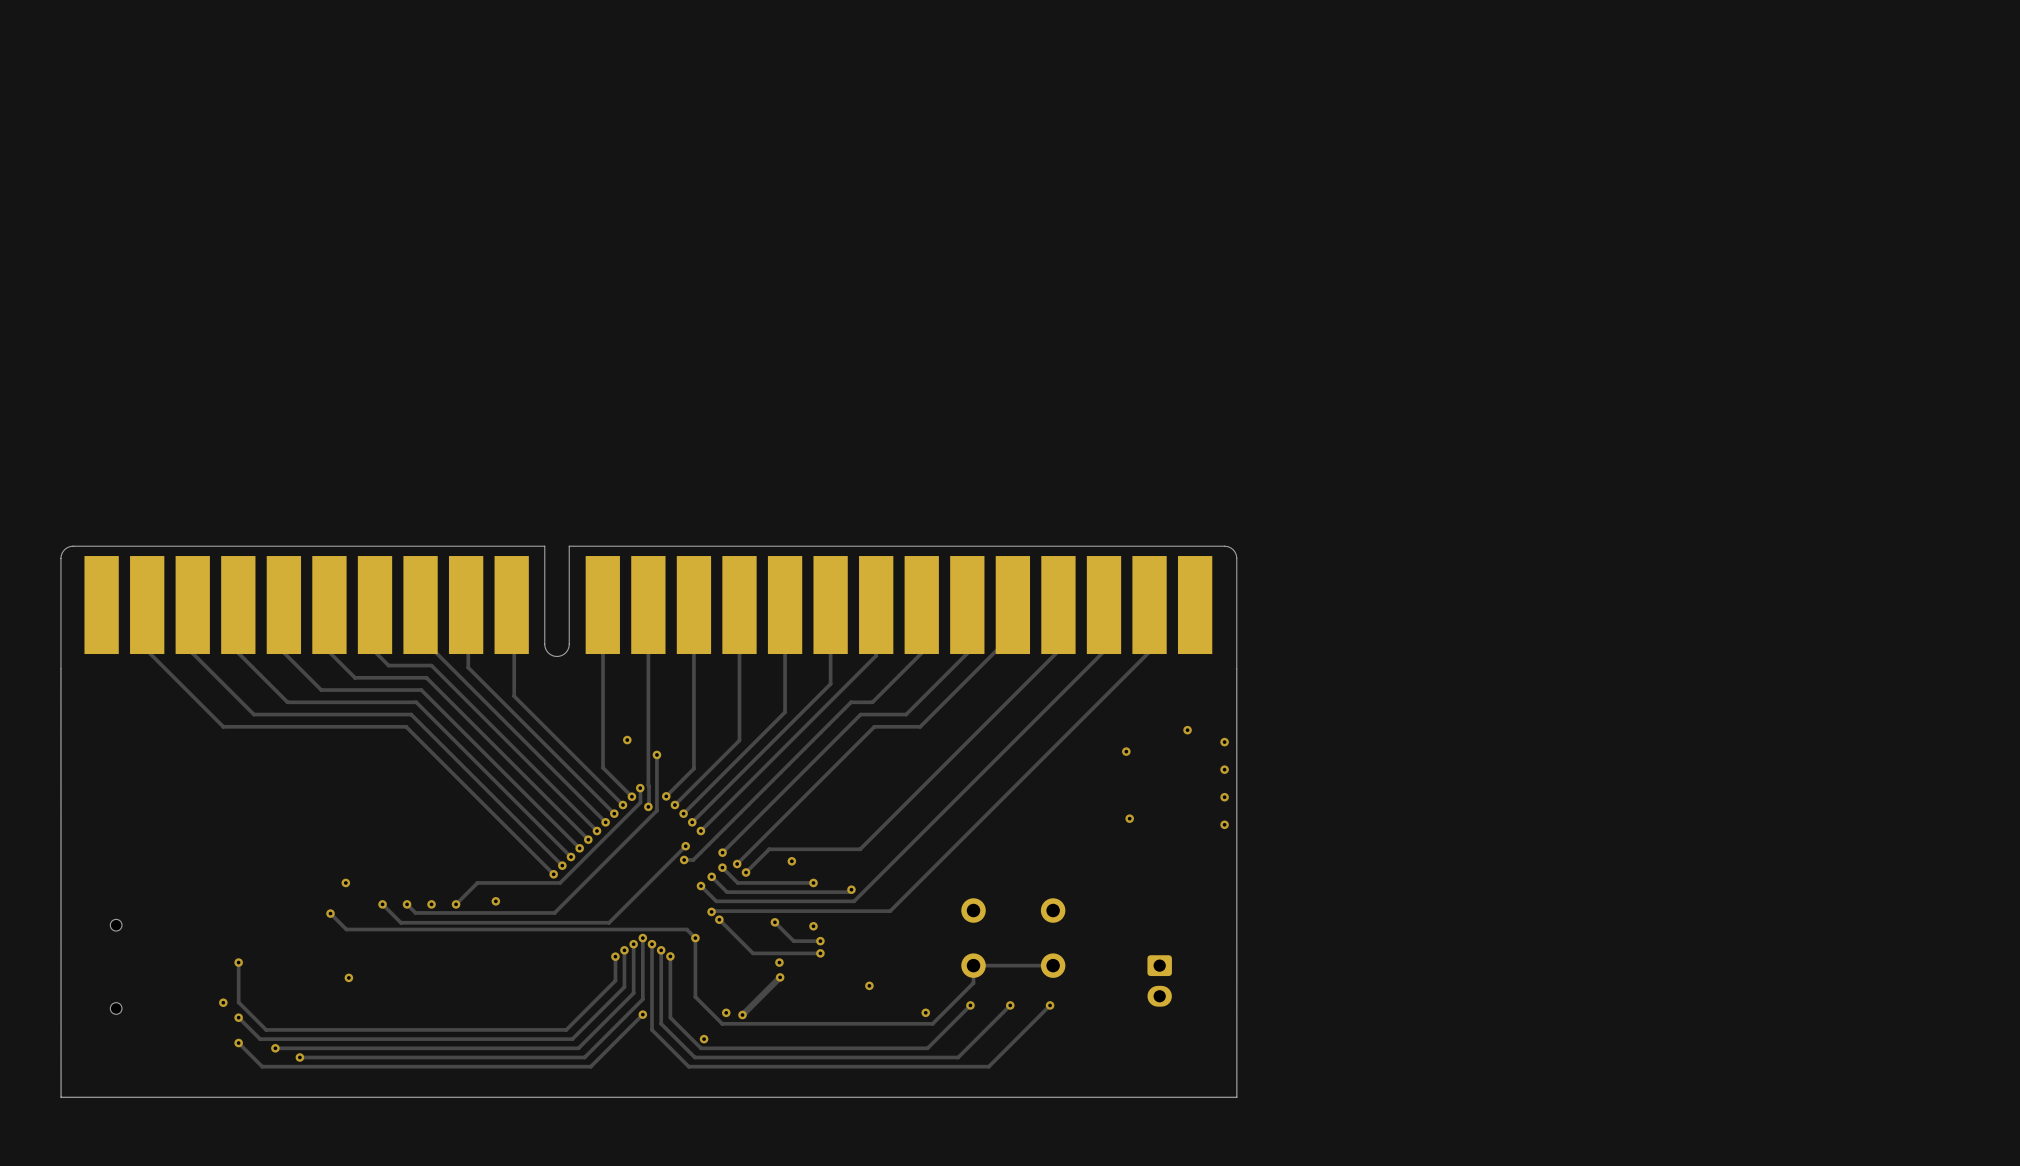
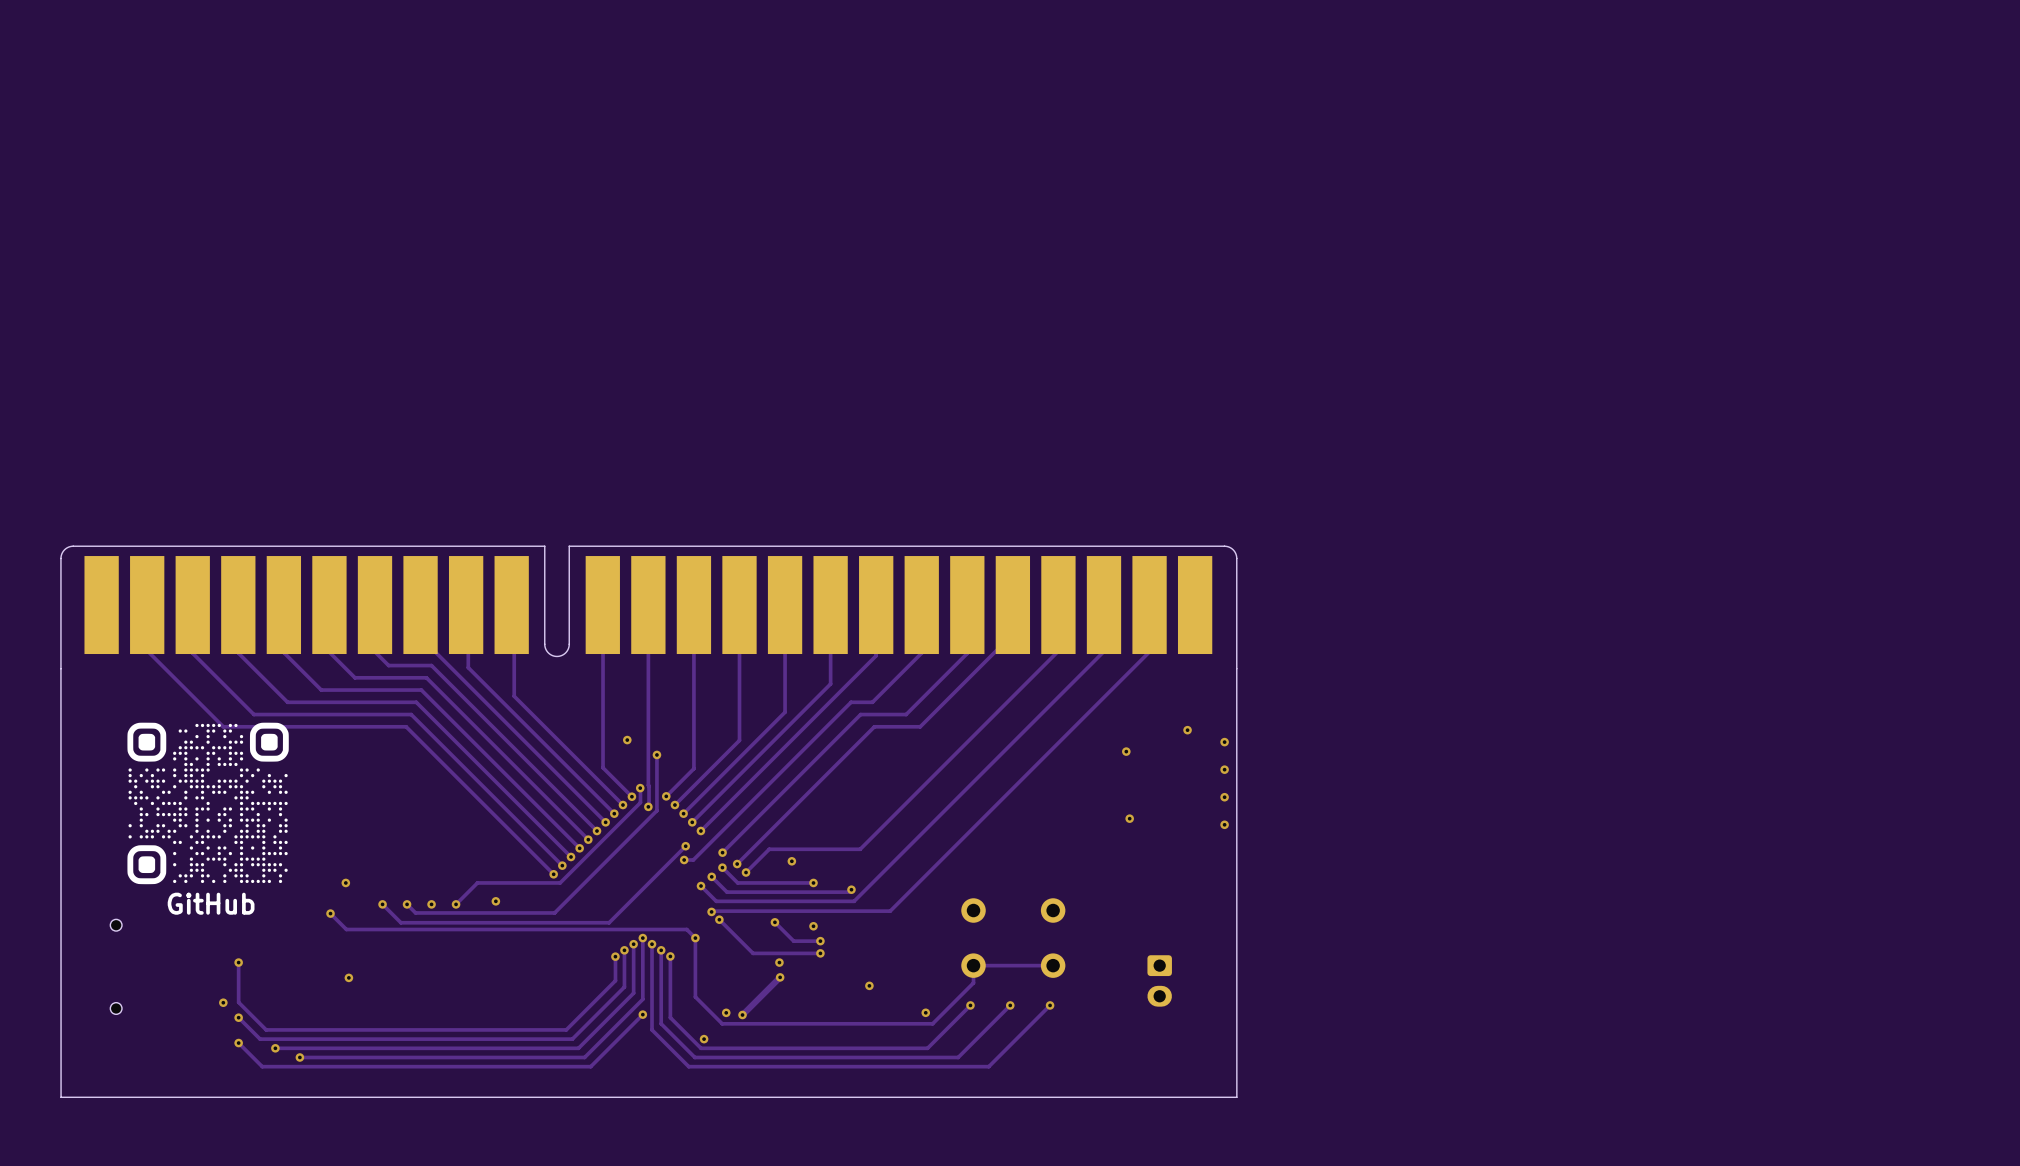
GitHub: none -> (208, 803)

